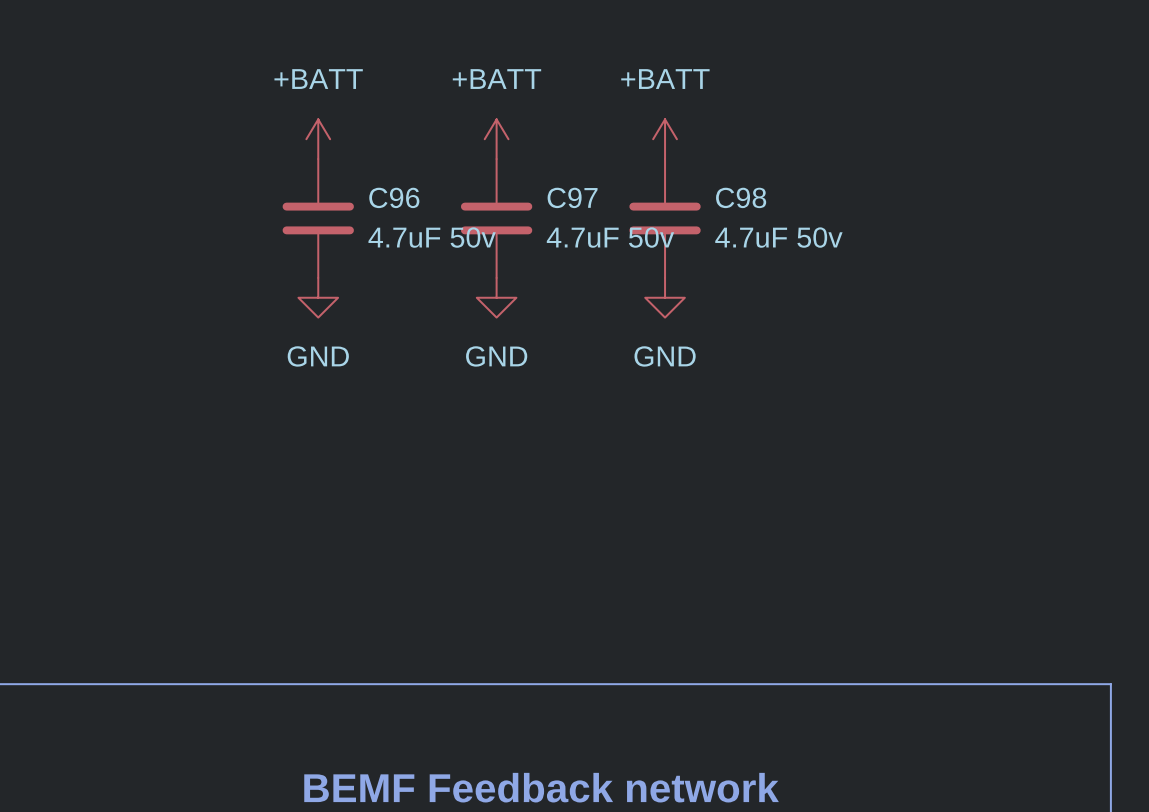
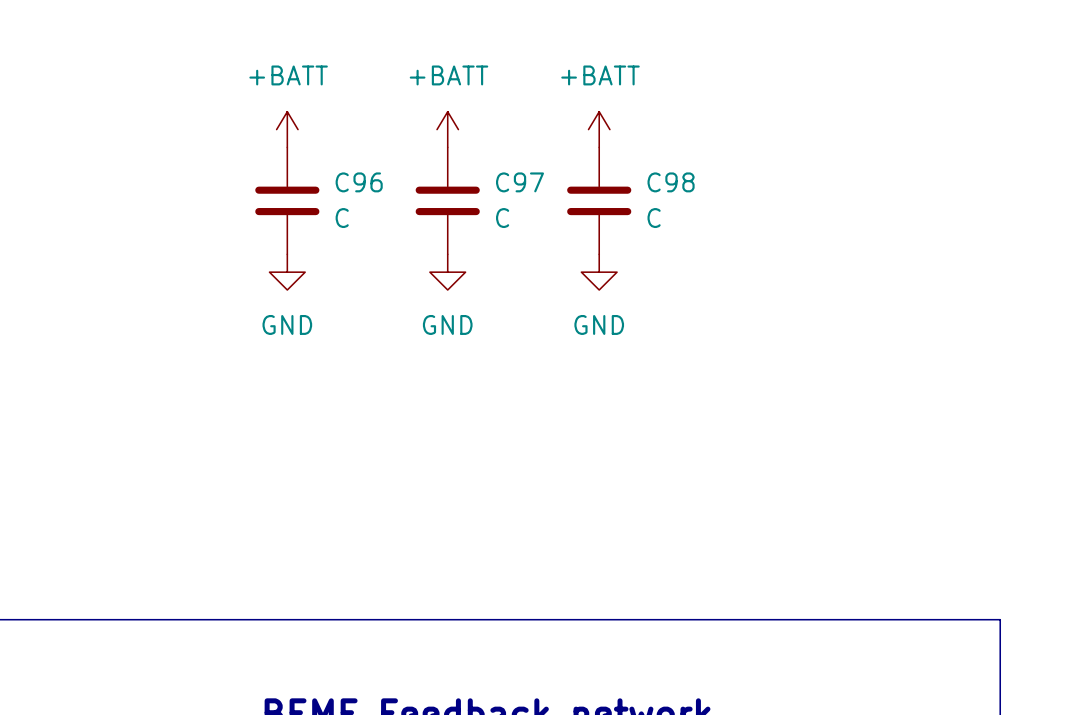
C96 value: 4.7uF 50v (432, 237) -> C (342, 218)
C97 value: 4.7uF 50v (610, 237) -> C (502, 218)
C98 value: 4.7uF 50v (778, 237) -> C (654, 218)

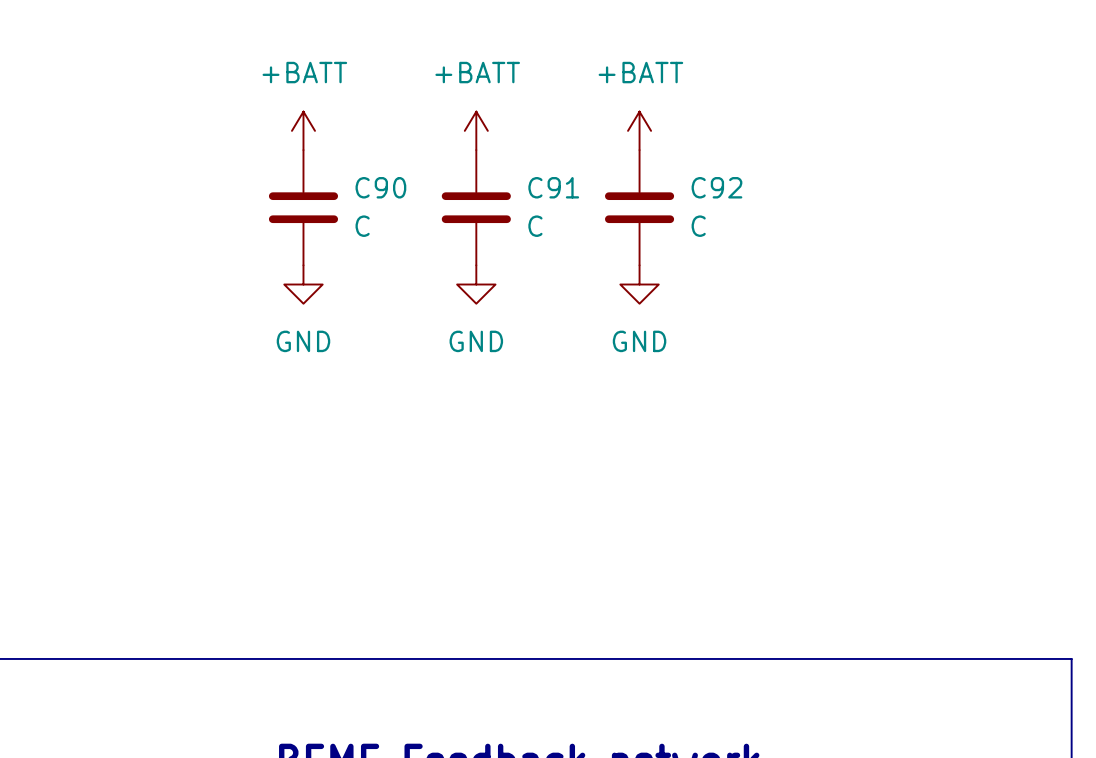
C96 name: C96 (359, 182) -> C90 (380, 187)
C97 name: C97 (520, 182) -> C91 (553, 187)
C98 name: C98 (671, 182) -> C92 (716, 187)

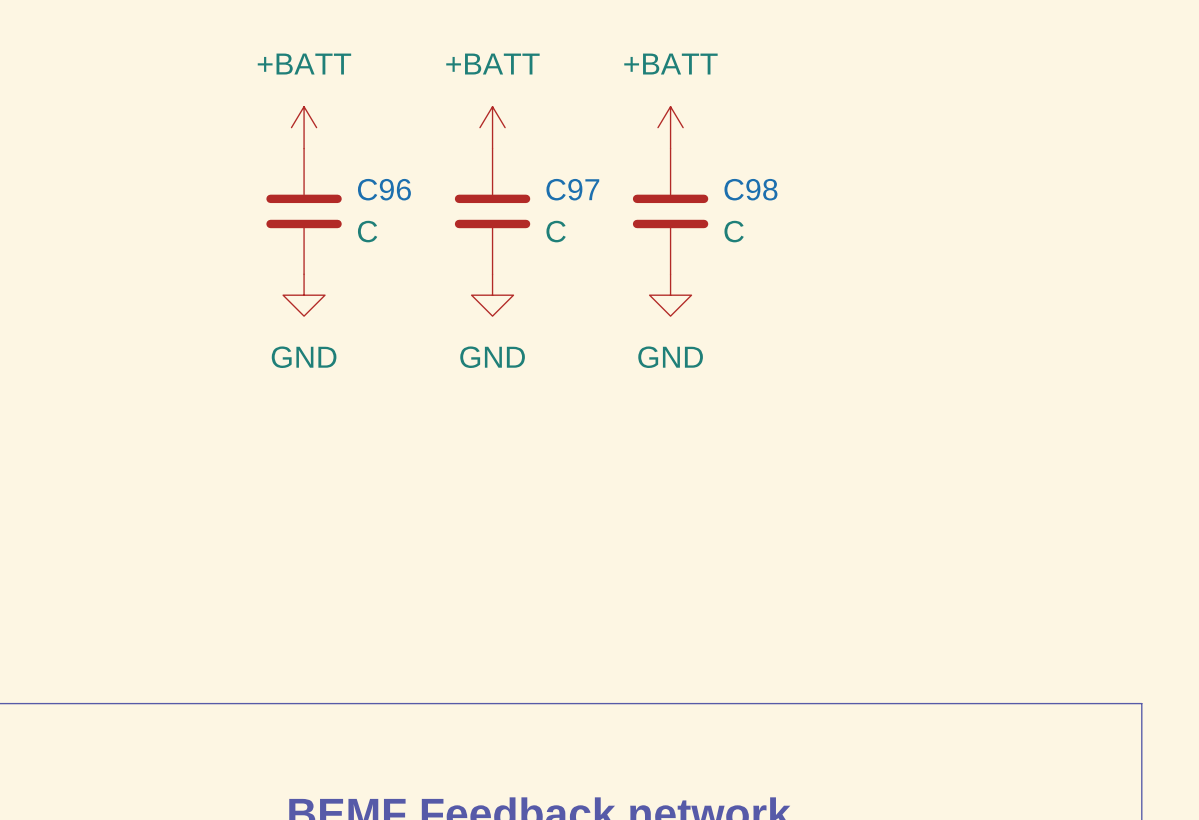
C90 name: C90 (380, 187) -> C96 (384, 189)
C91 name: C91 (553, 187) -> C97 (572, 189)
C92 name: C92 (716, 187) -> C98 (750, 189)

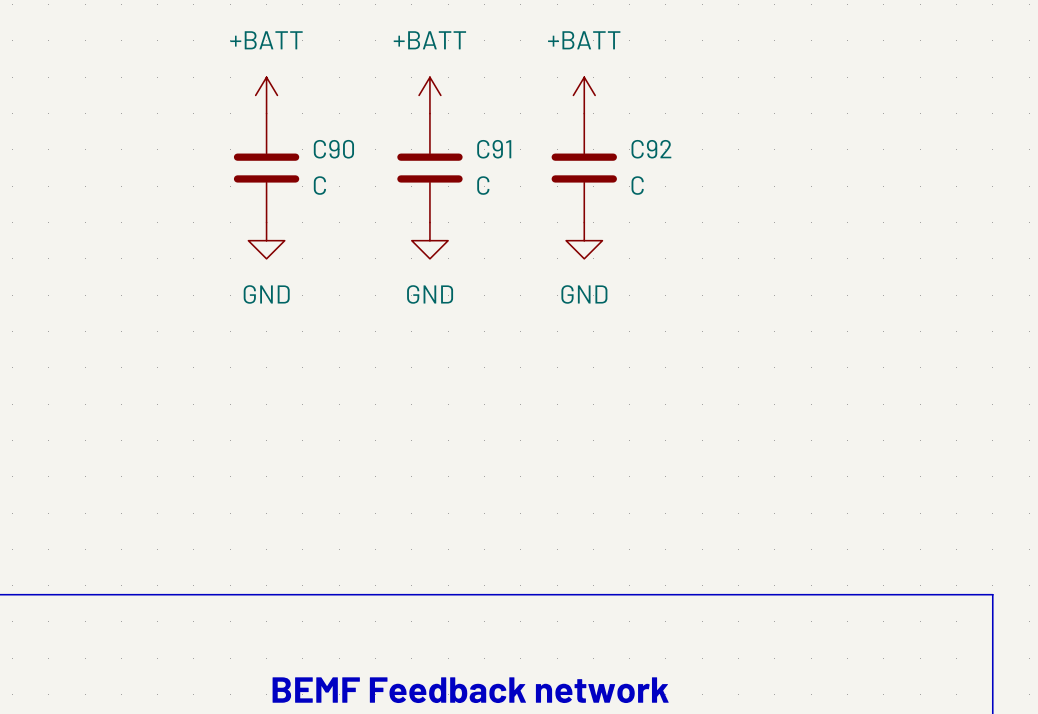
C96 name: C96 (384, 189) -> C90 (333, 149)
C97 name: C97 (572, 189) -> C91 (494, 149)
C98 name: C98 (750, 189) -> C92 (651, 149)

